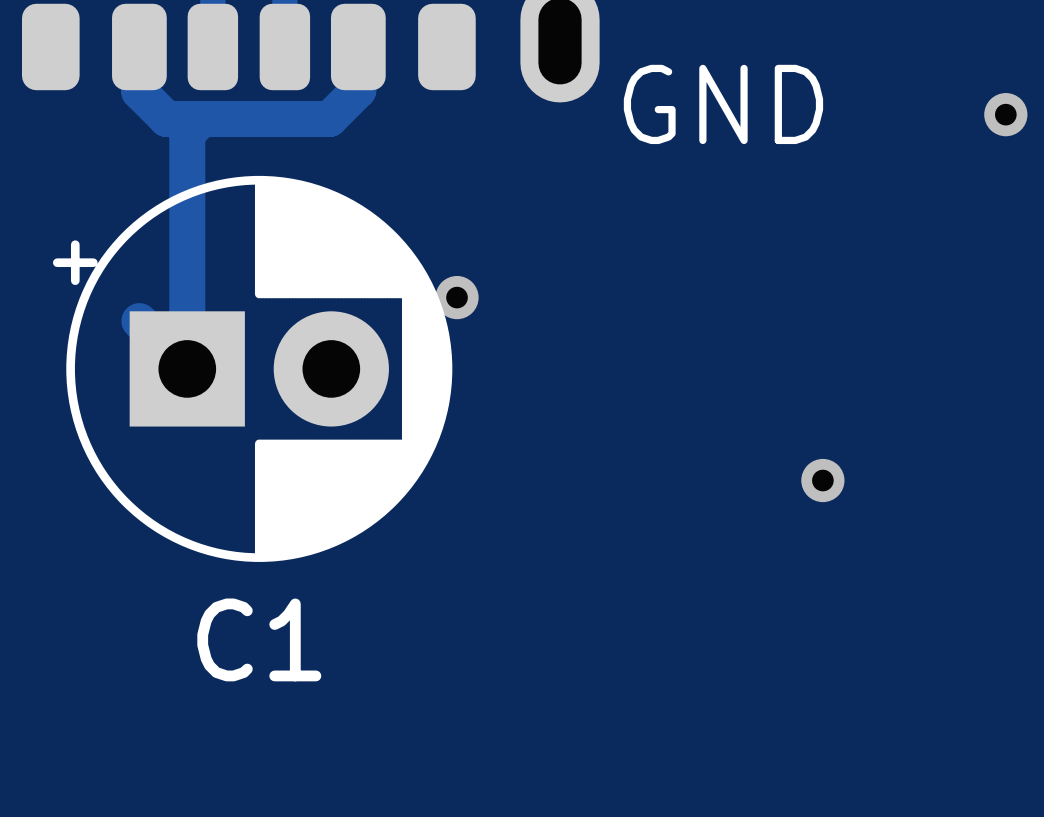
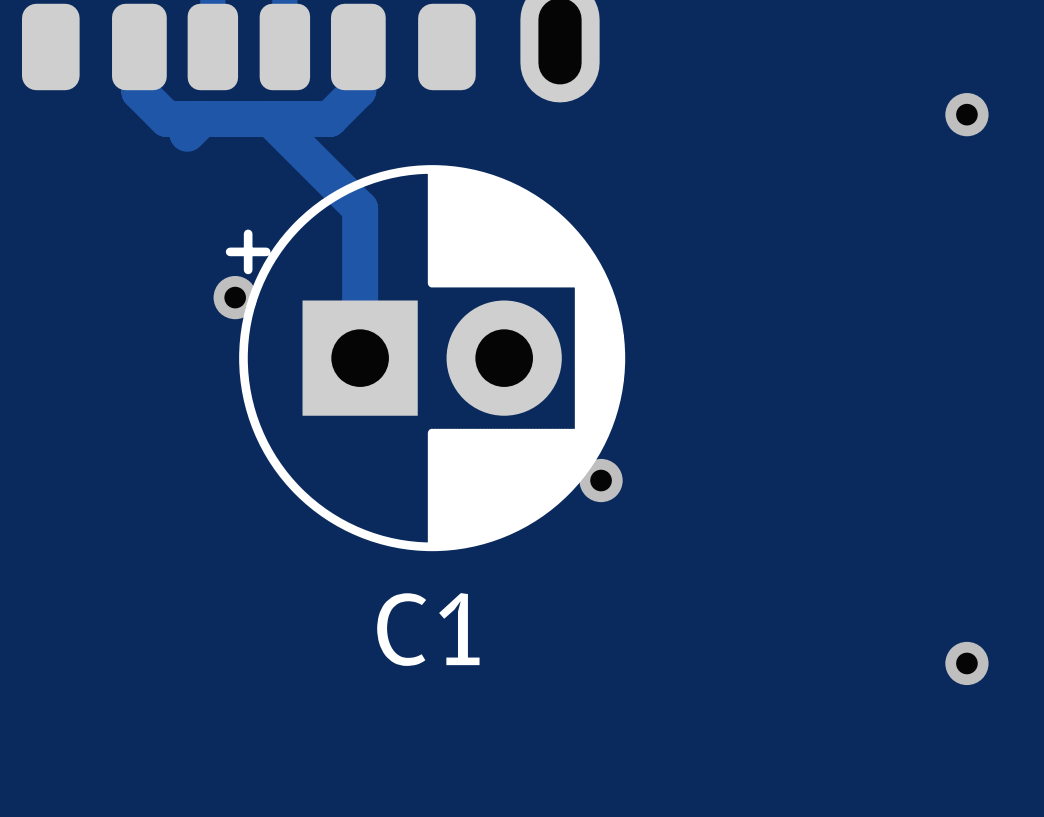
text: GND (723, 104) -> none
via position: (1005, 114) -> (966, 114)
track: none -> (270, 119) (360, 208) (360, 358)
track: (187, 133) (187, 368) (139, 321) -> none
via: none -> (235, 297)
via: (457, 297) -> none
C1 position: (252, 368) -> (425, 358)
via: none -> (601, 480)
via: (822, 480) -> none
via: none -> (966, 663)

